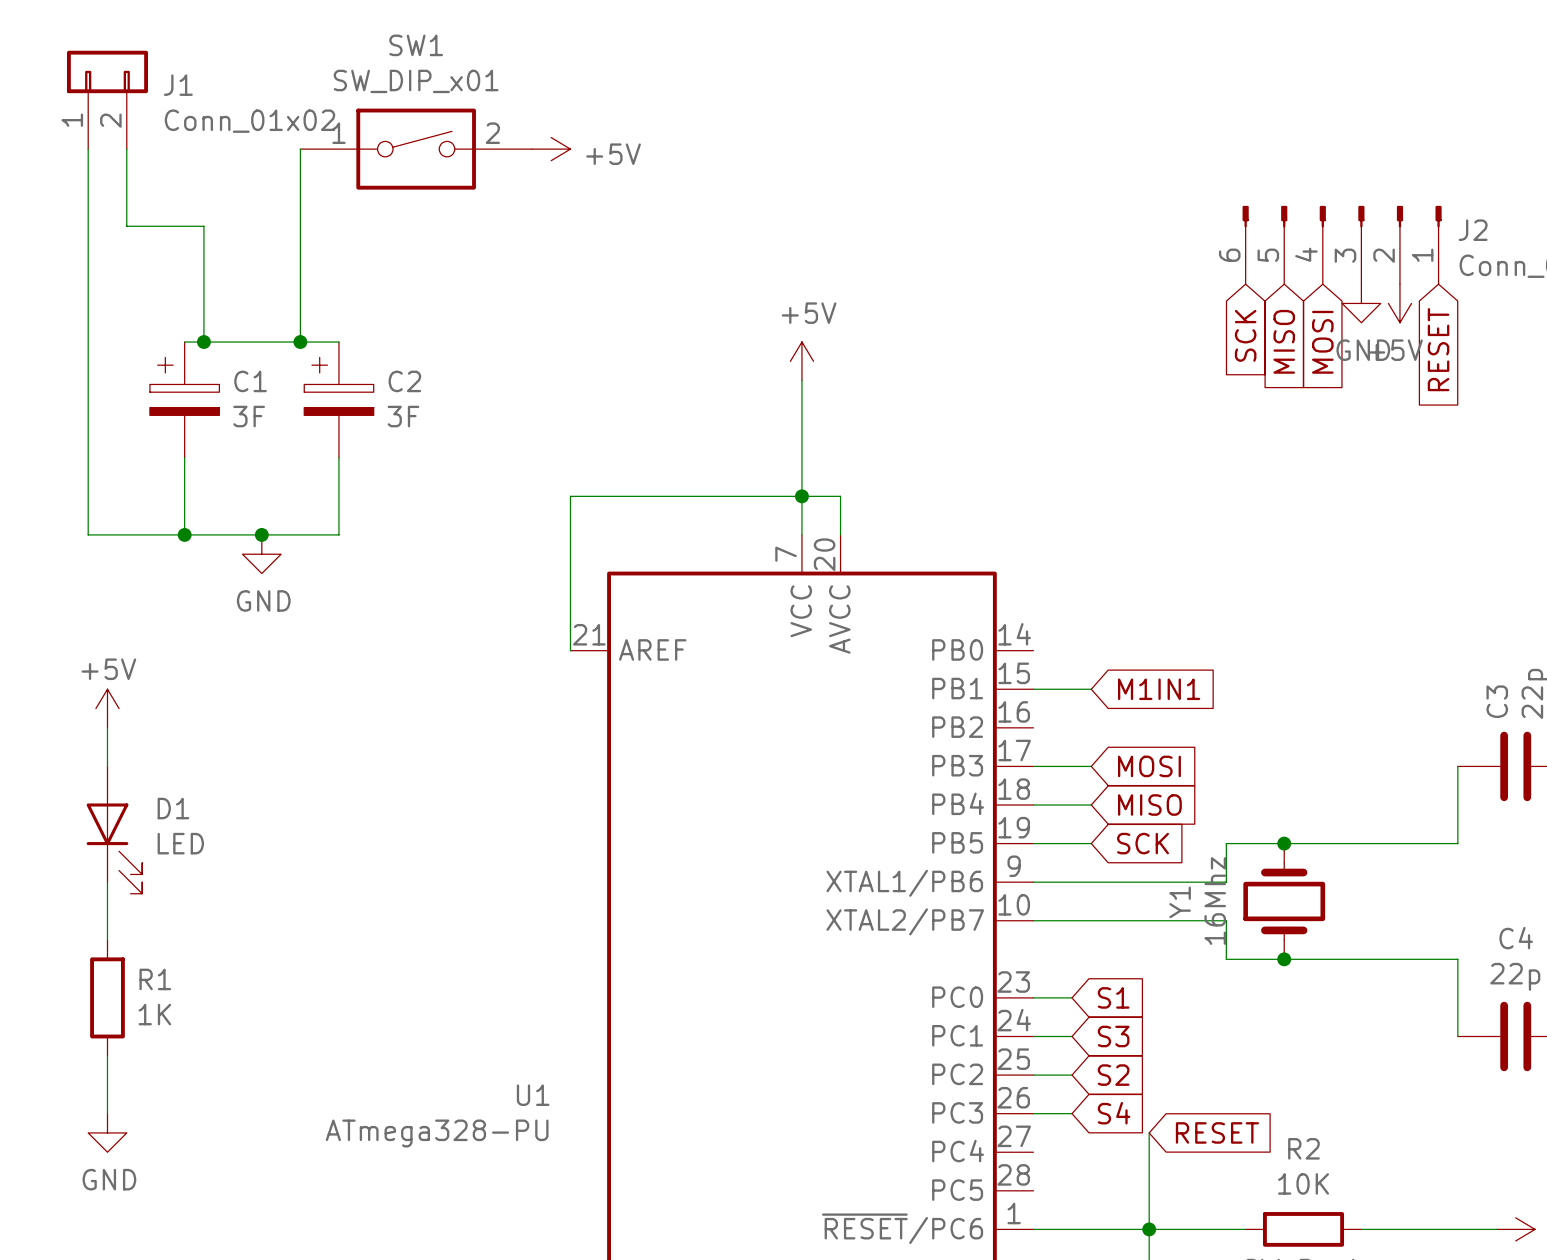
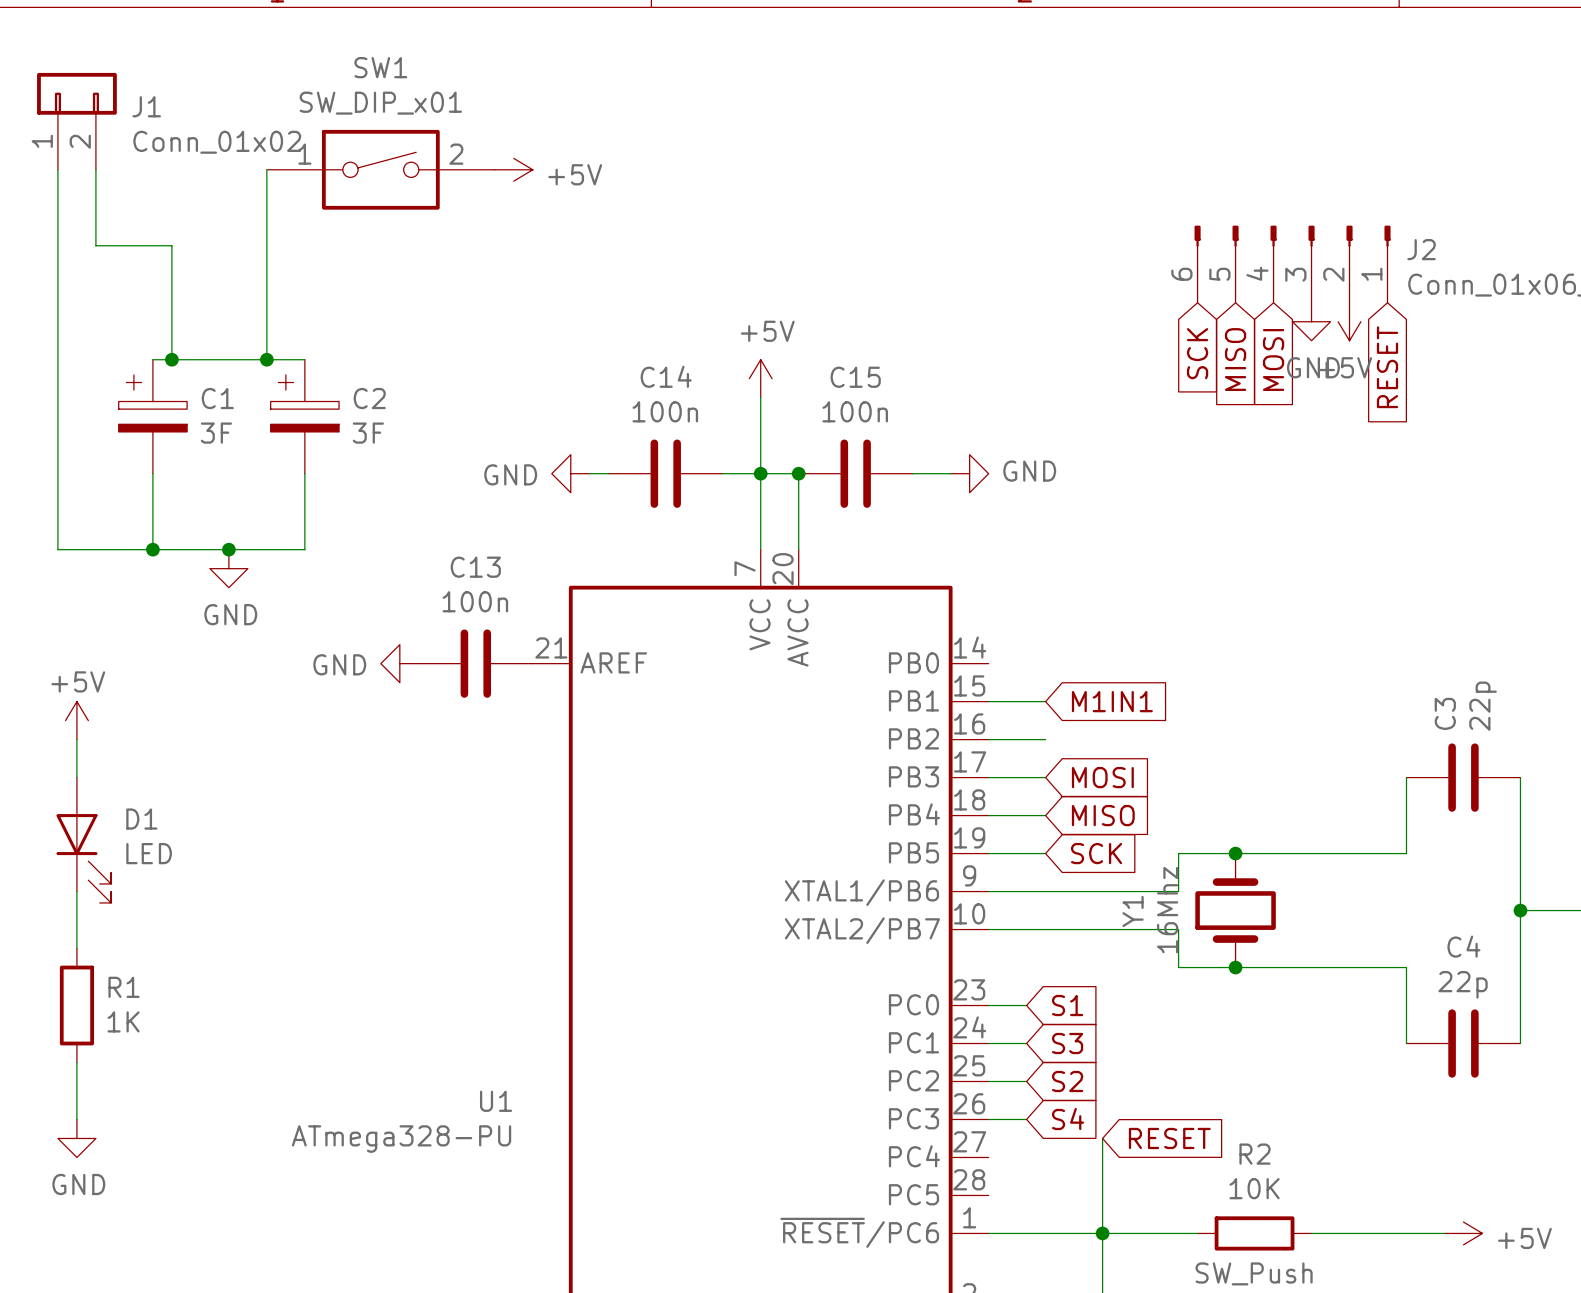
power symbol: none -> GND (570, 473)
wire: none -> (589, 473) (608, 473)
C14: none -> 100n (665, 473)
junction: none -> (760, 473)
junction: none -> (798, 473)
C15: none -> 100n (855, 473)
wire: none -> (912, 473) (950, 473)
power symbol: none -> GND (969, 473)
junction: (801, 496) -> none
wire: (840, 496) (570, 496) (570, 650) -> (798, 511) (798, 473) (722, 473)
power symbol: none -> GND (399, 663)
C13: none -> 100n (475, 663)
wire: none -> (988, 739) (1045, 739)

